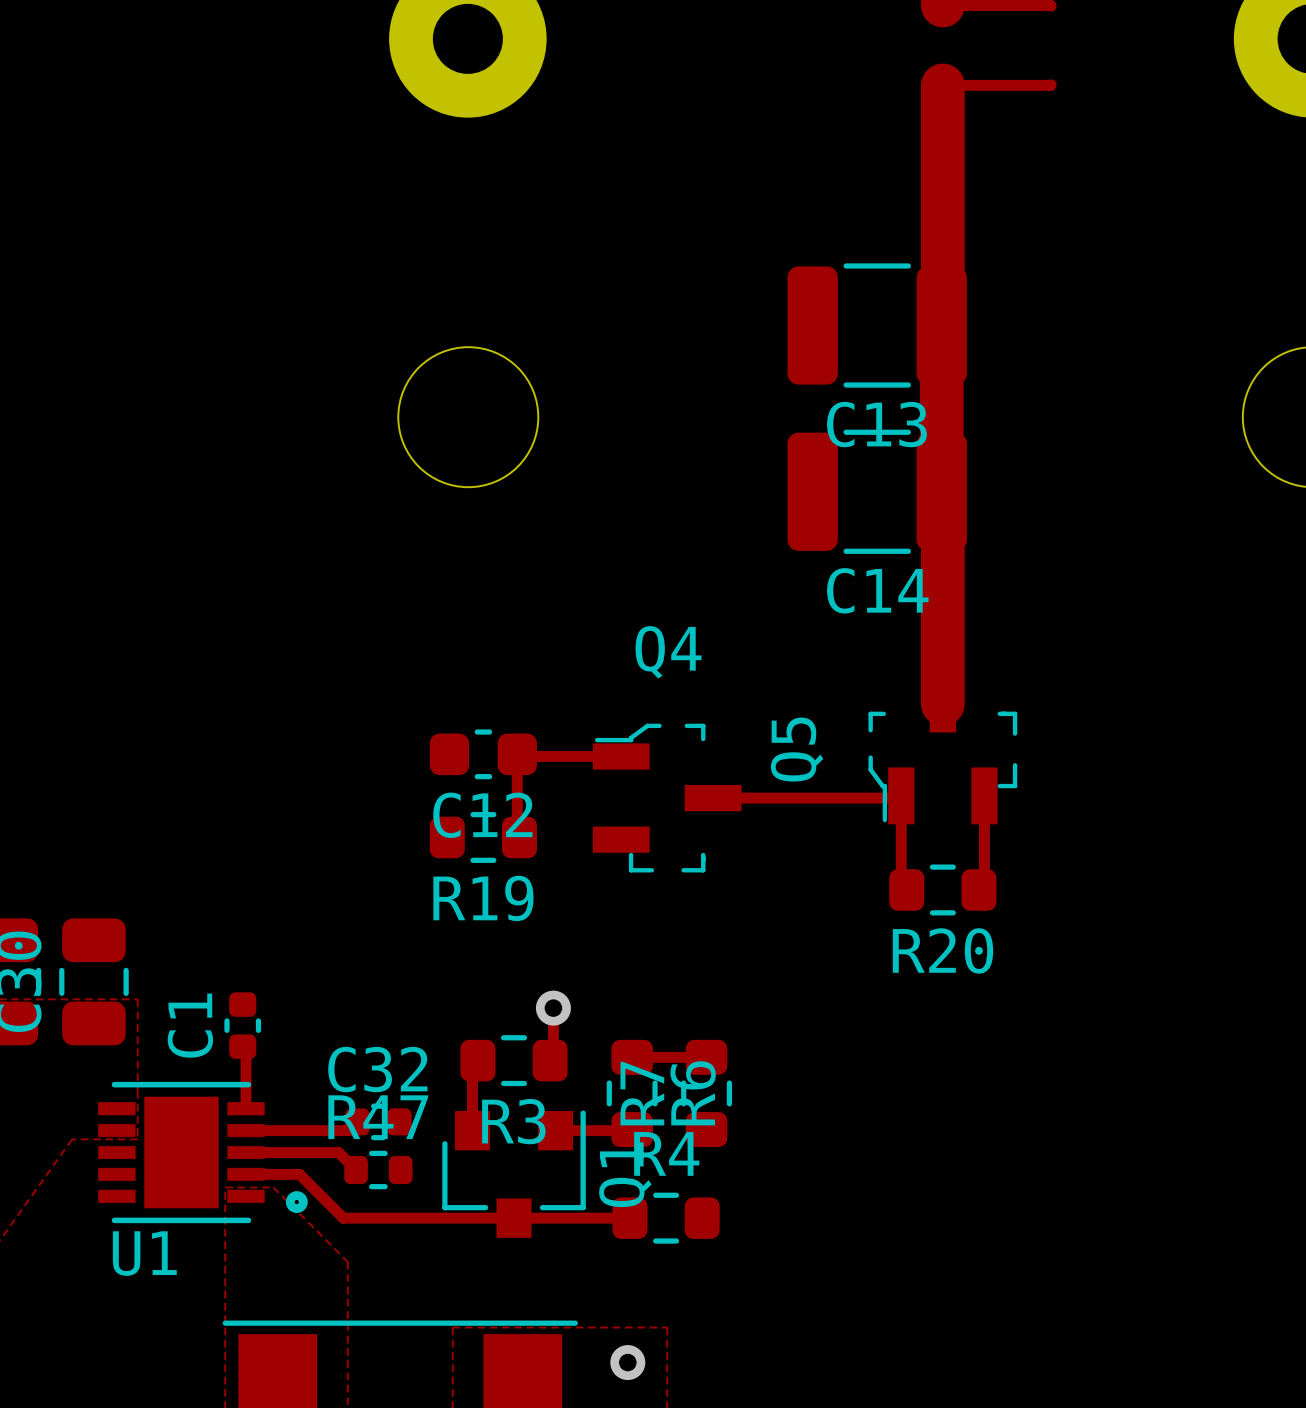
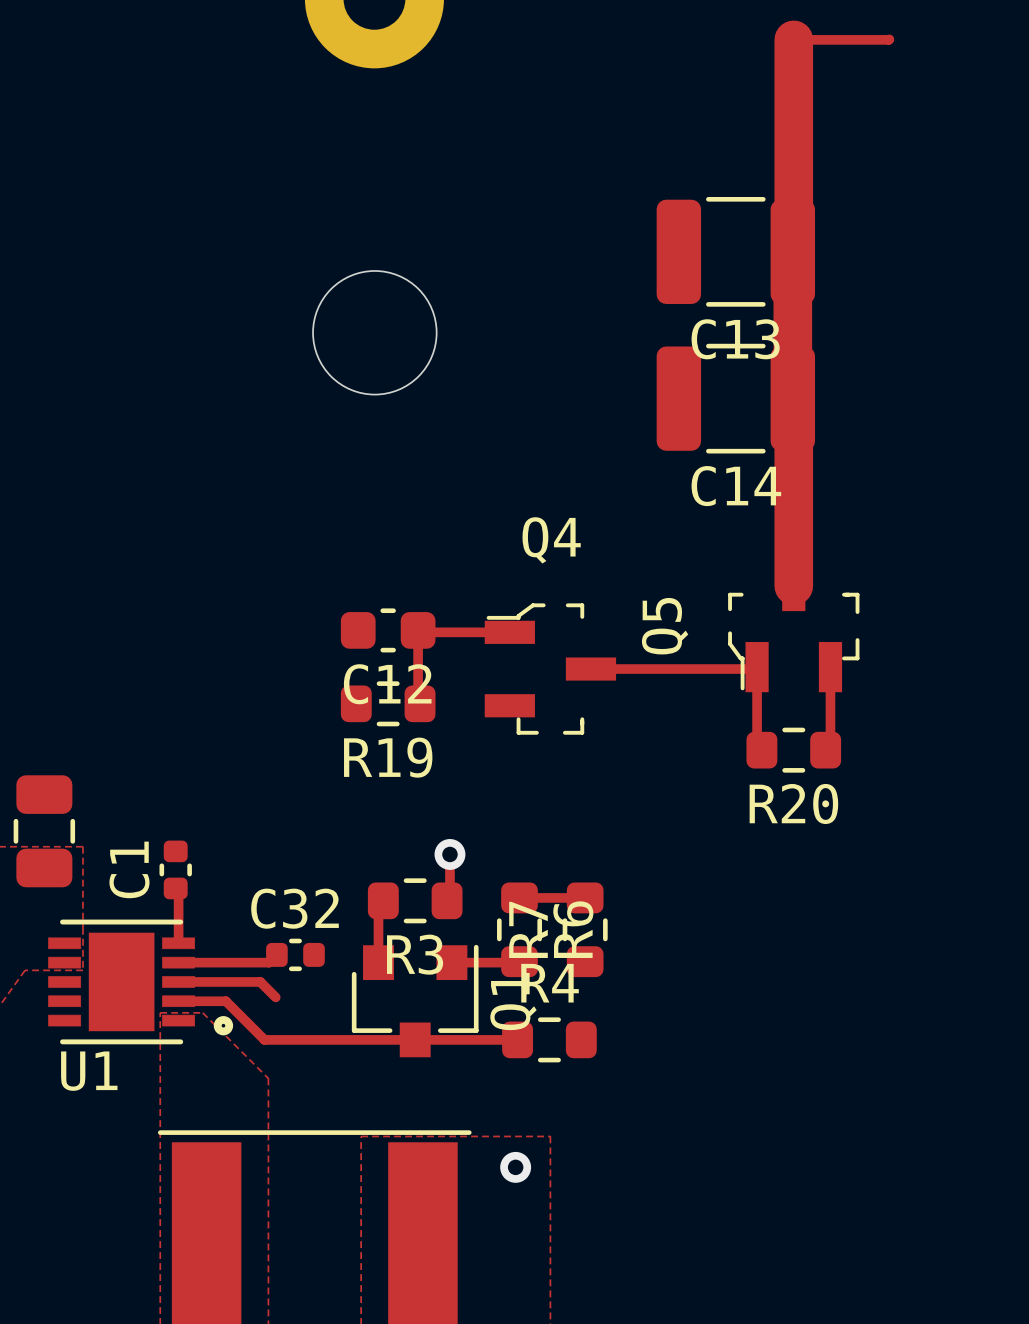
R47: (378, 1170) -> none

